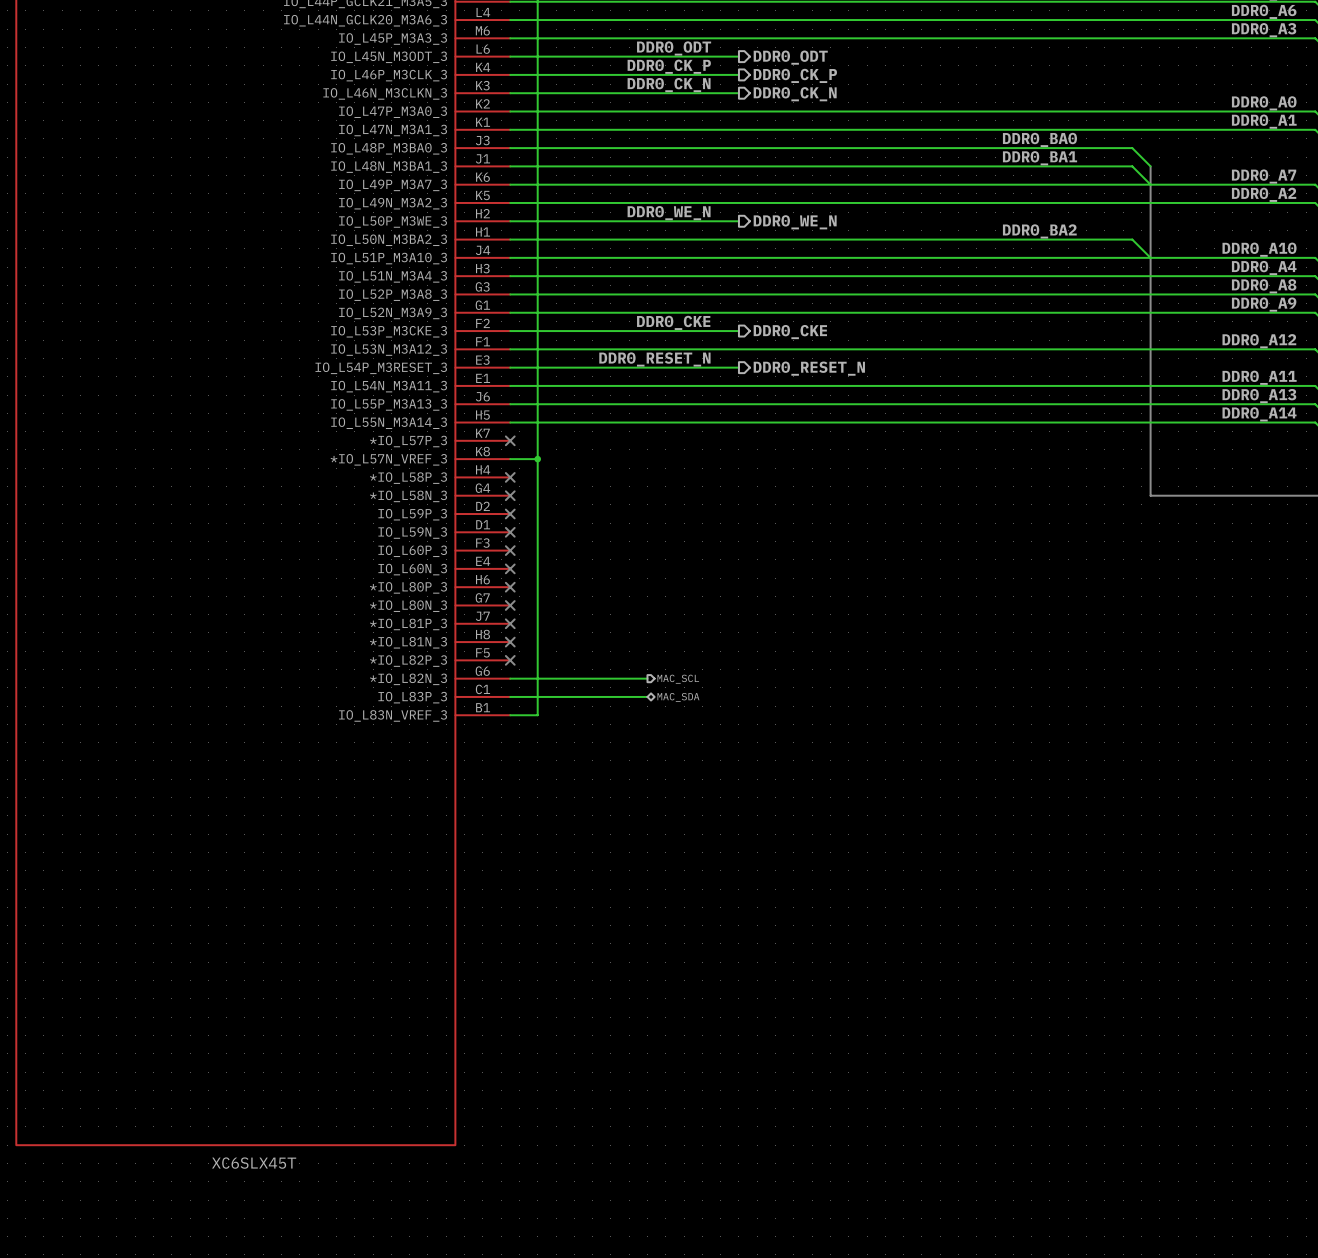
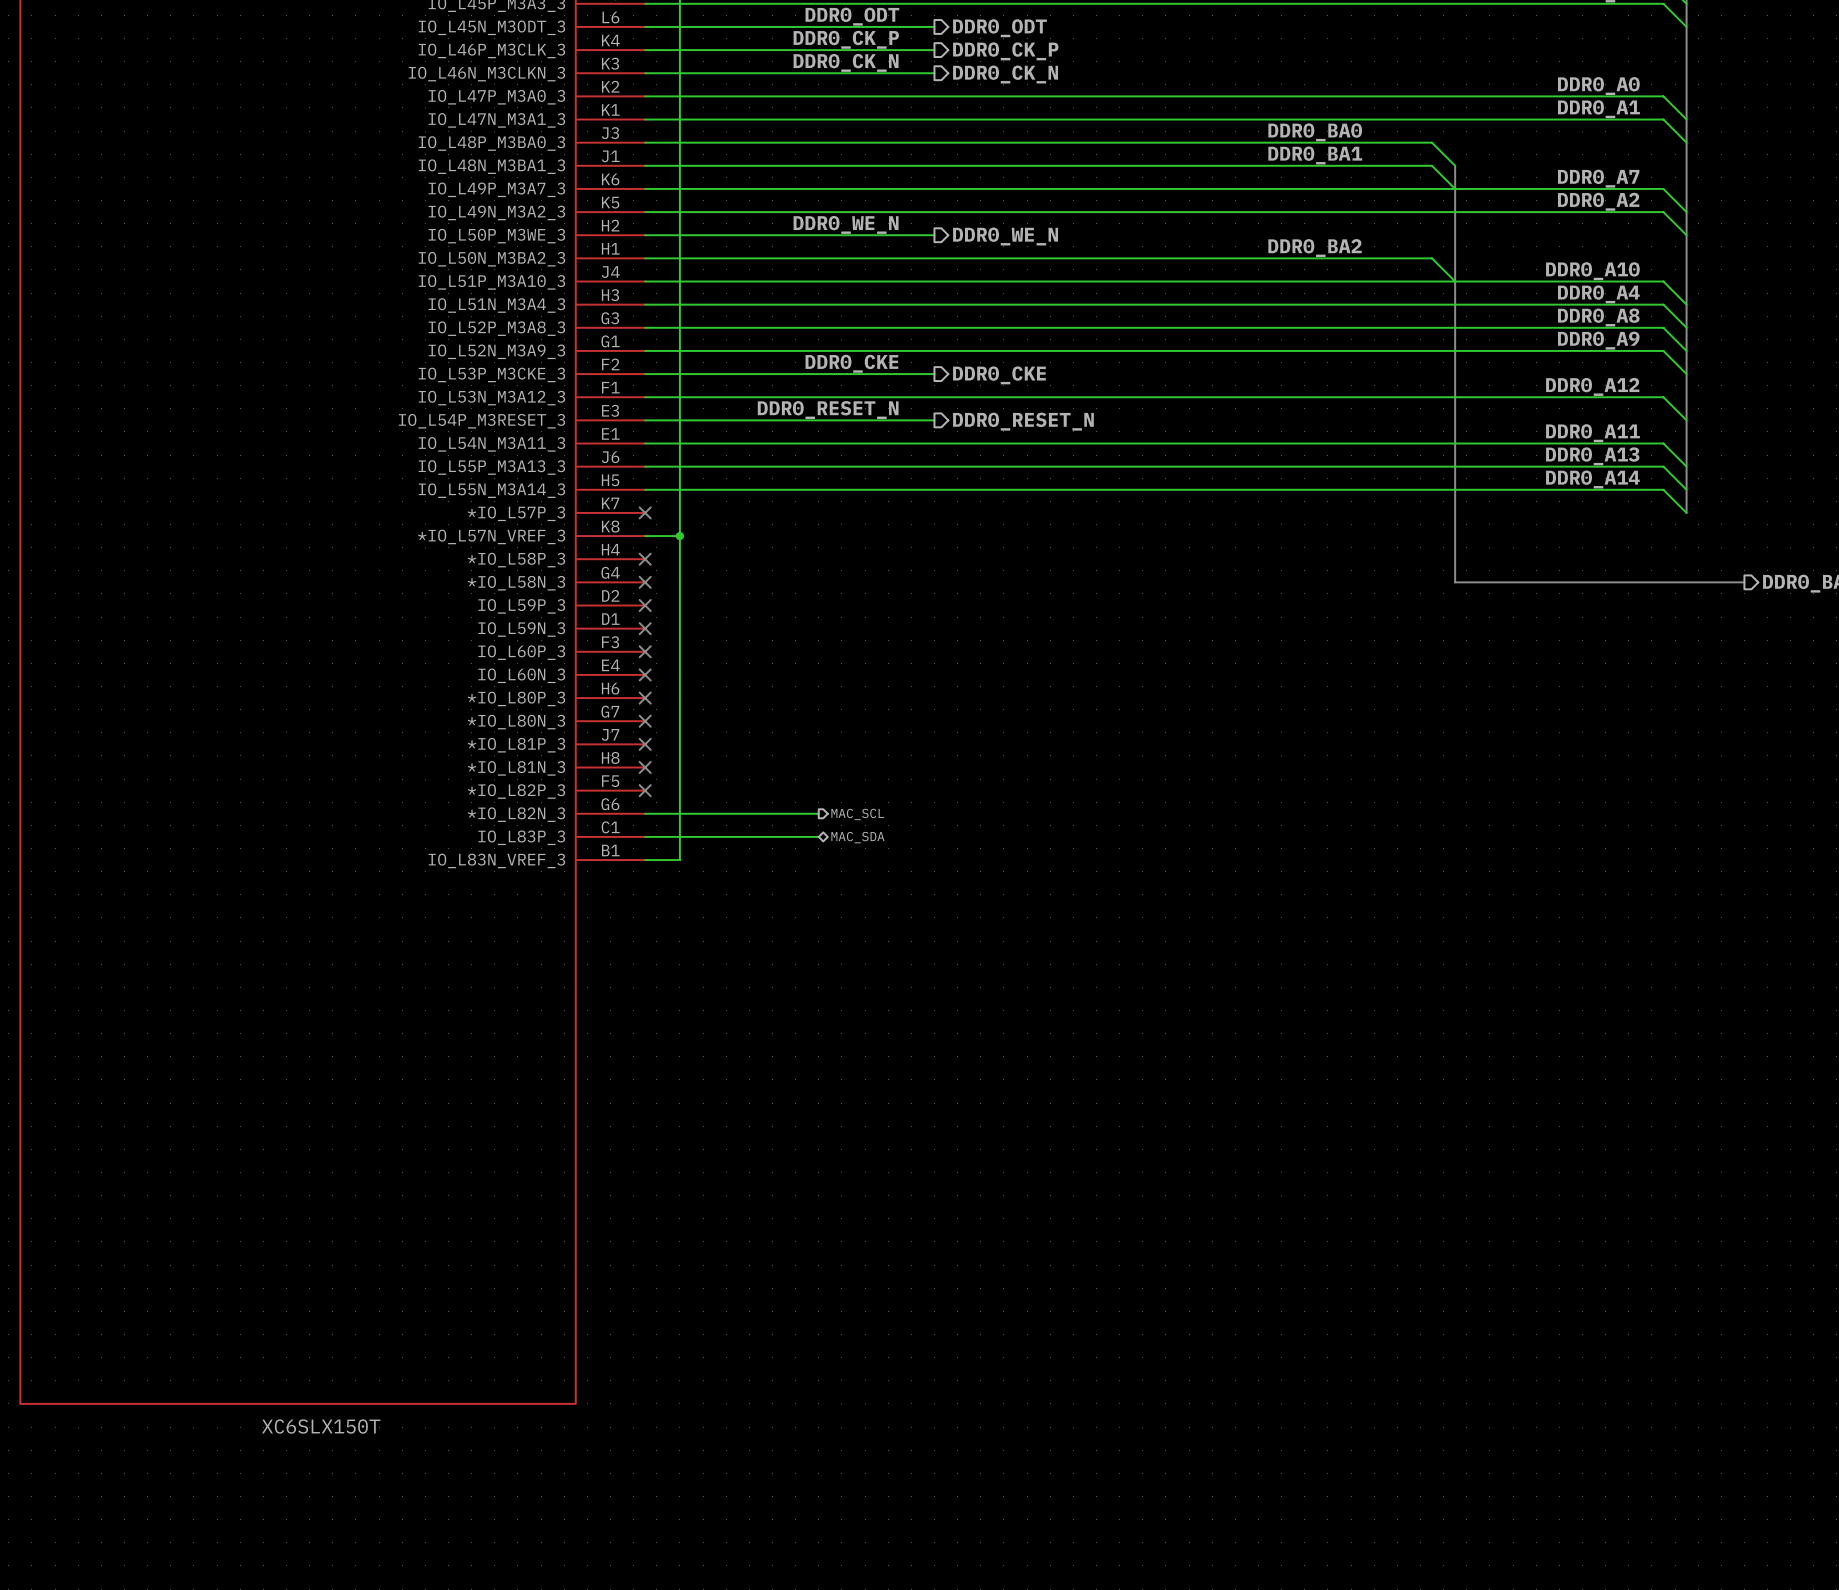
part value: XC6SLX45T (254, 1163) -> XC6SLX150T (321, 1426)

